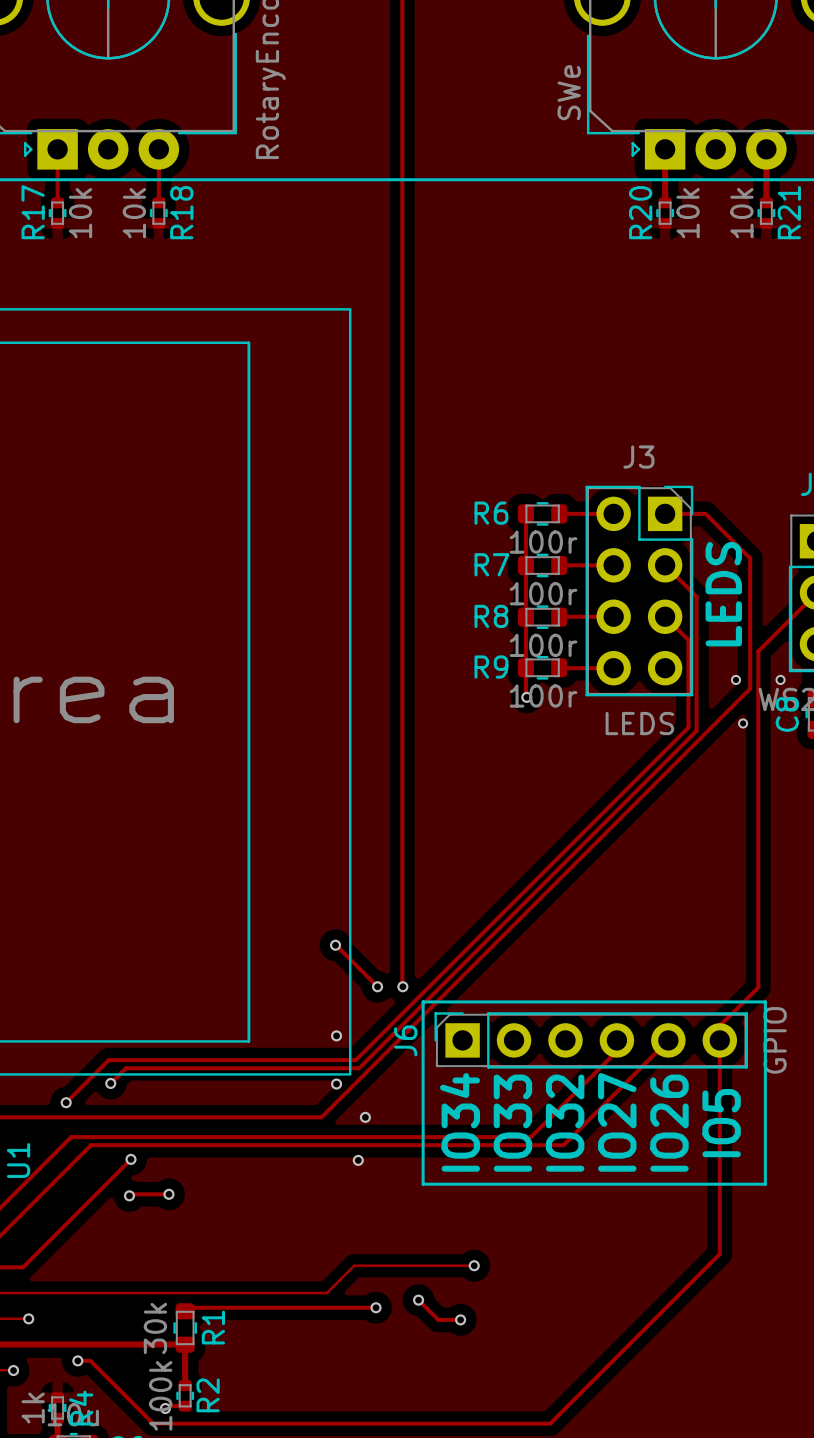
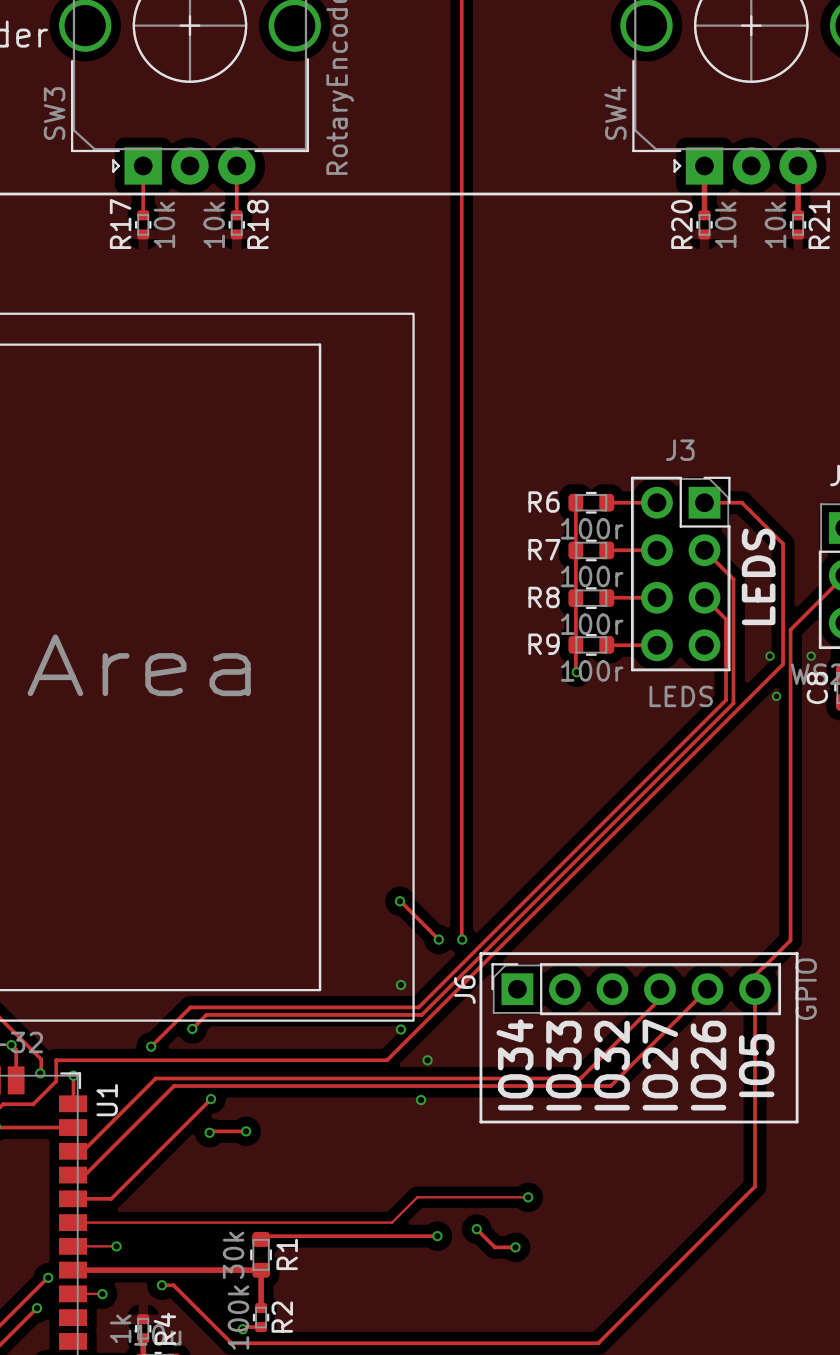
SWe name: SWe (569, 92) -> SW4 (615, 113)

